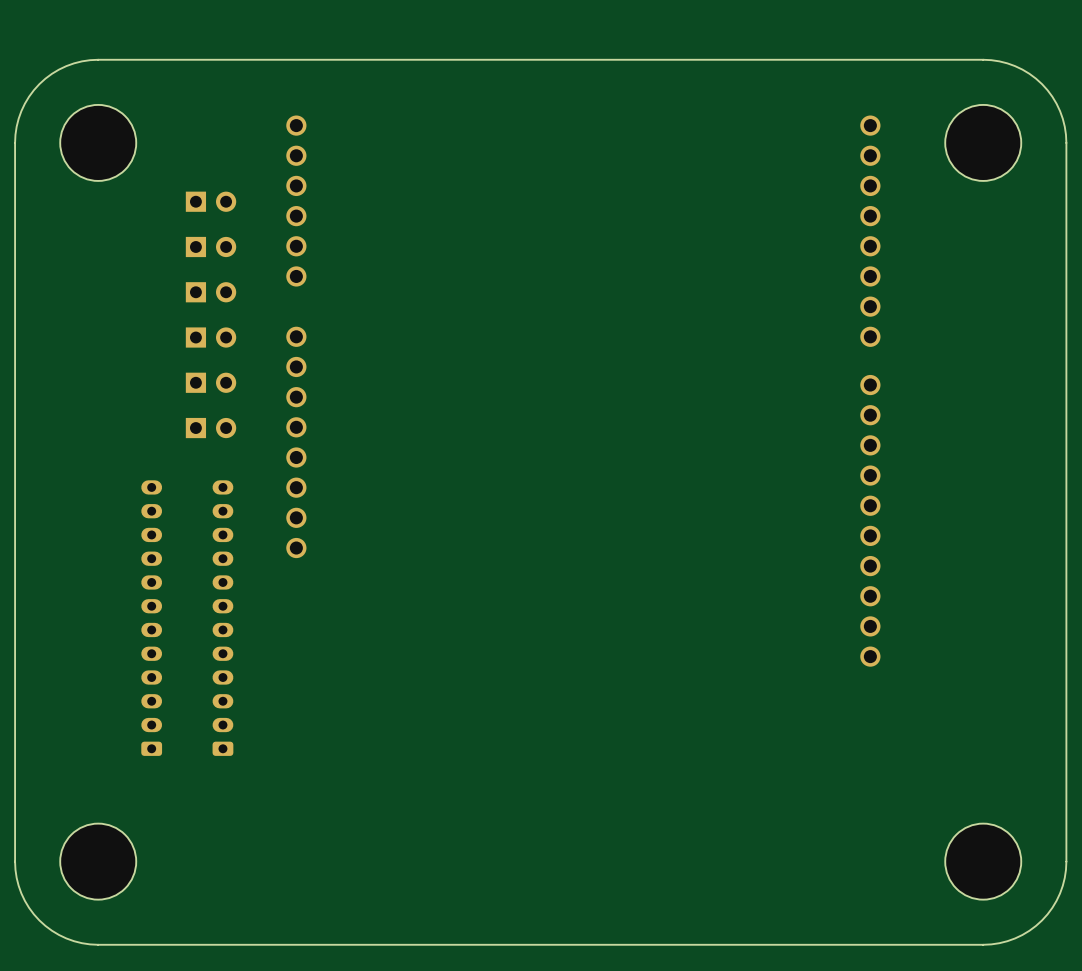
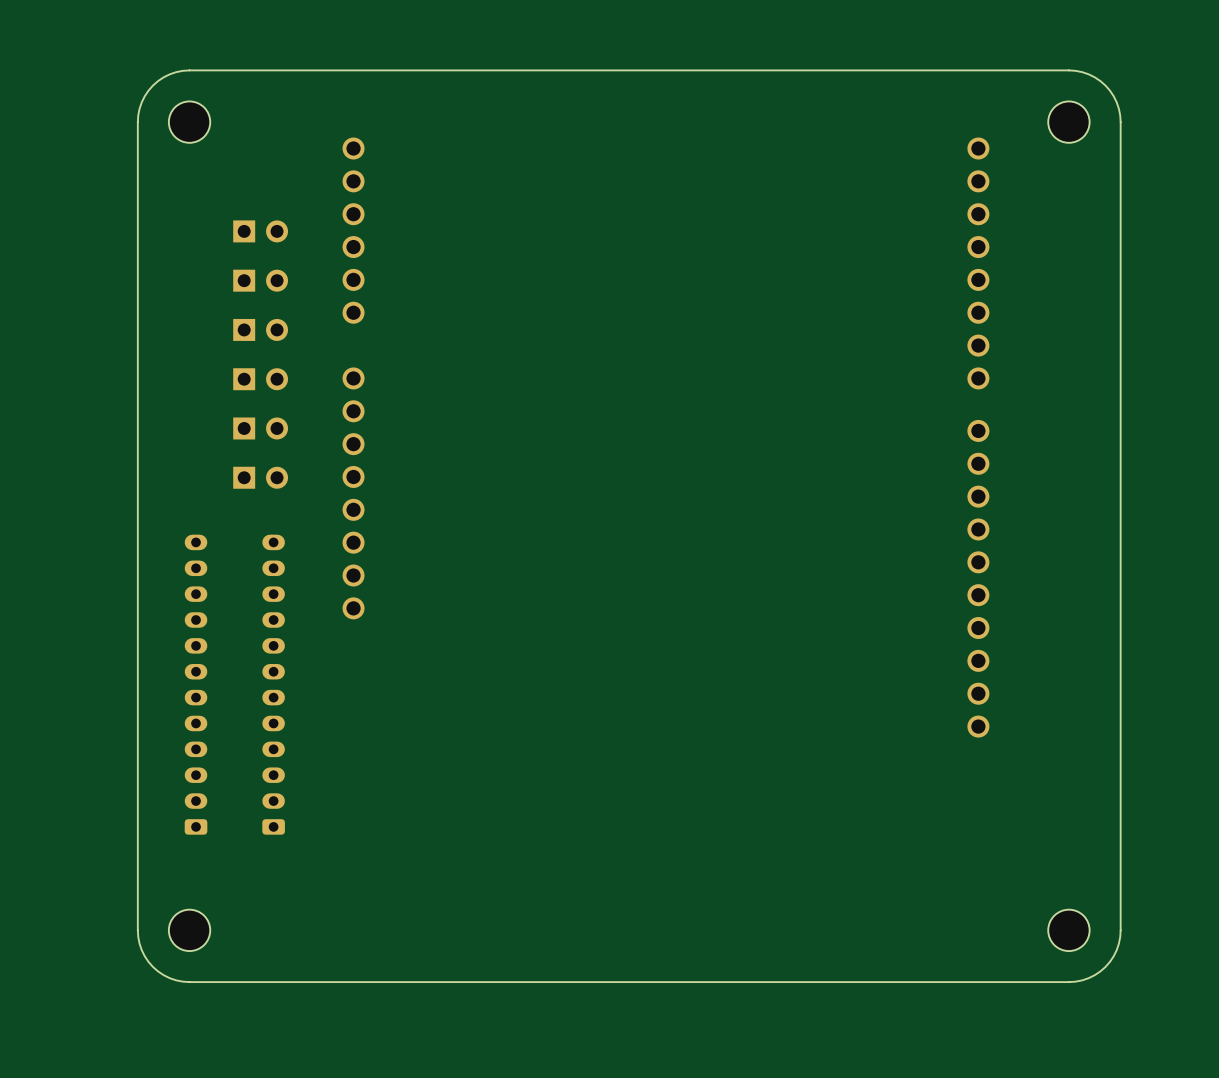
board edge: (983, 59) (98, 59) (82, 61) (66, 66) (45, 78) (33, 90) (21, 111) (16, 126) (15, 142) (15, 861) (18, 885) (24, 900) (33, 914) (45, 925) (59, 934) (74, 941) (98, 944) (983, 944) (1007, 941) (1022, 934) (1035, 925) (1047, 914) (1056, 900) (1062, 885) (1066, 861) (1065, 134) (1062, 118) (1056, 103) (1042, 84) (1029, 73) (1015, 66) (999, 61) (983, 59) -> (1068, 70) (1088, 74) (1105, 85) (1116, 102) (1120, 122) (1120, 930) (1116, 950) (1105, 966) (1088, 978) (1068, 982) (189, 982) (169, 978) (152, 966) (141, 950) (137, 930) (137, 122) (141, 102) (152, 85) (169, 74) (189, 70) (1068, 70)
part: none -> (189, 122)
part: none -> (1068, 122)
part: (98, 142) -> none
part: (983, 142) -> none
part: none -> (189, 930)
part: none -> (1068, 930)
part: (98, 861) -> none
part: (983, 861) -> none

